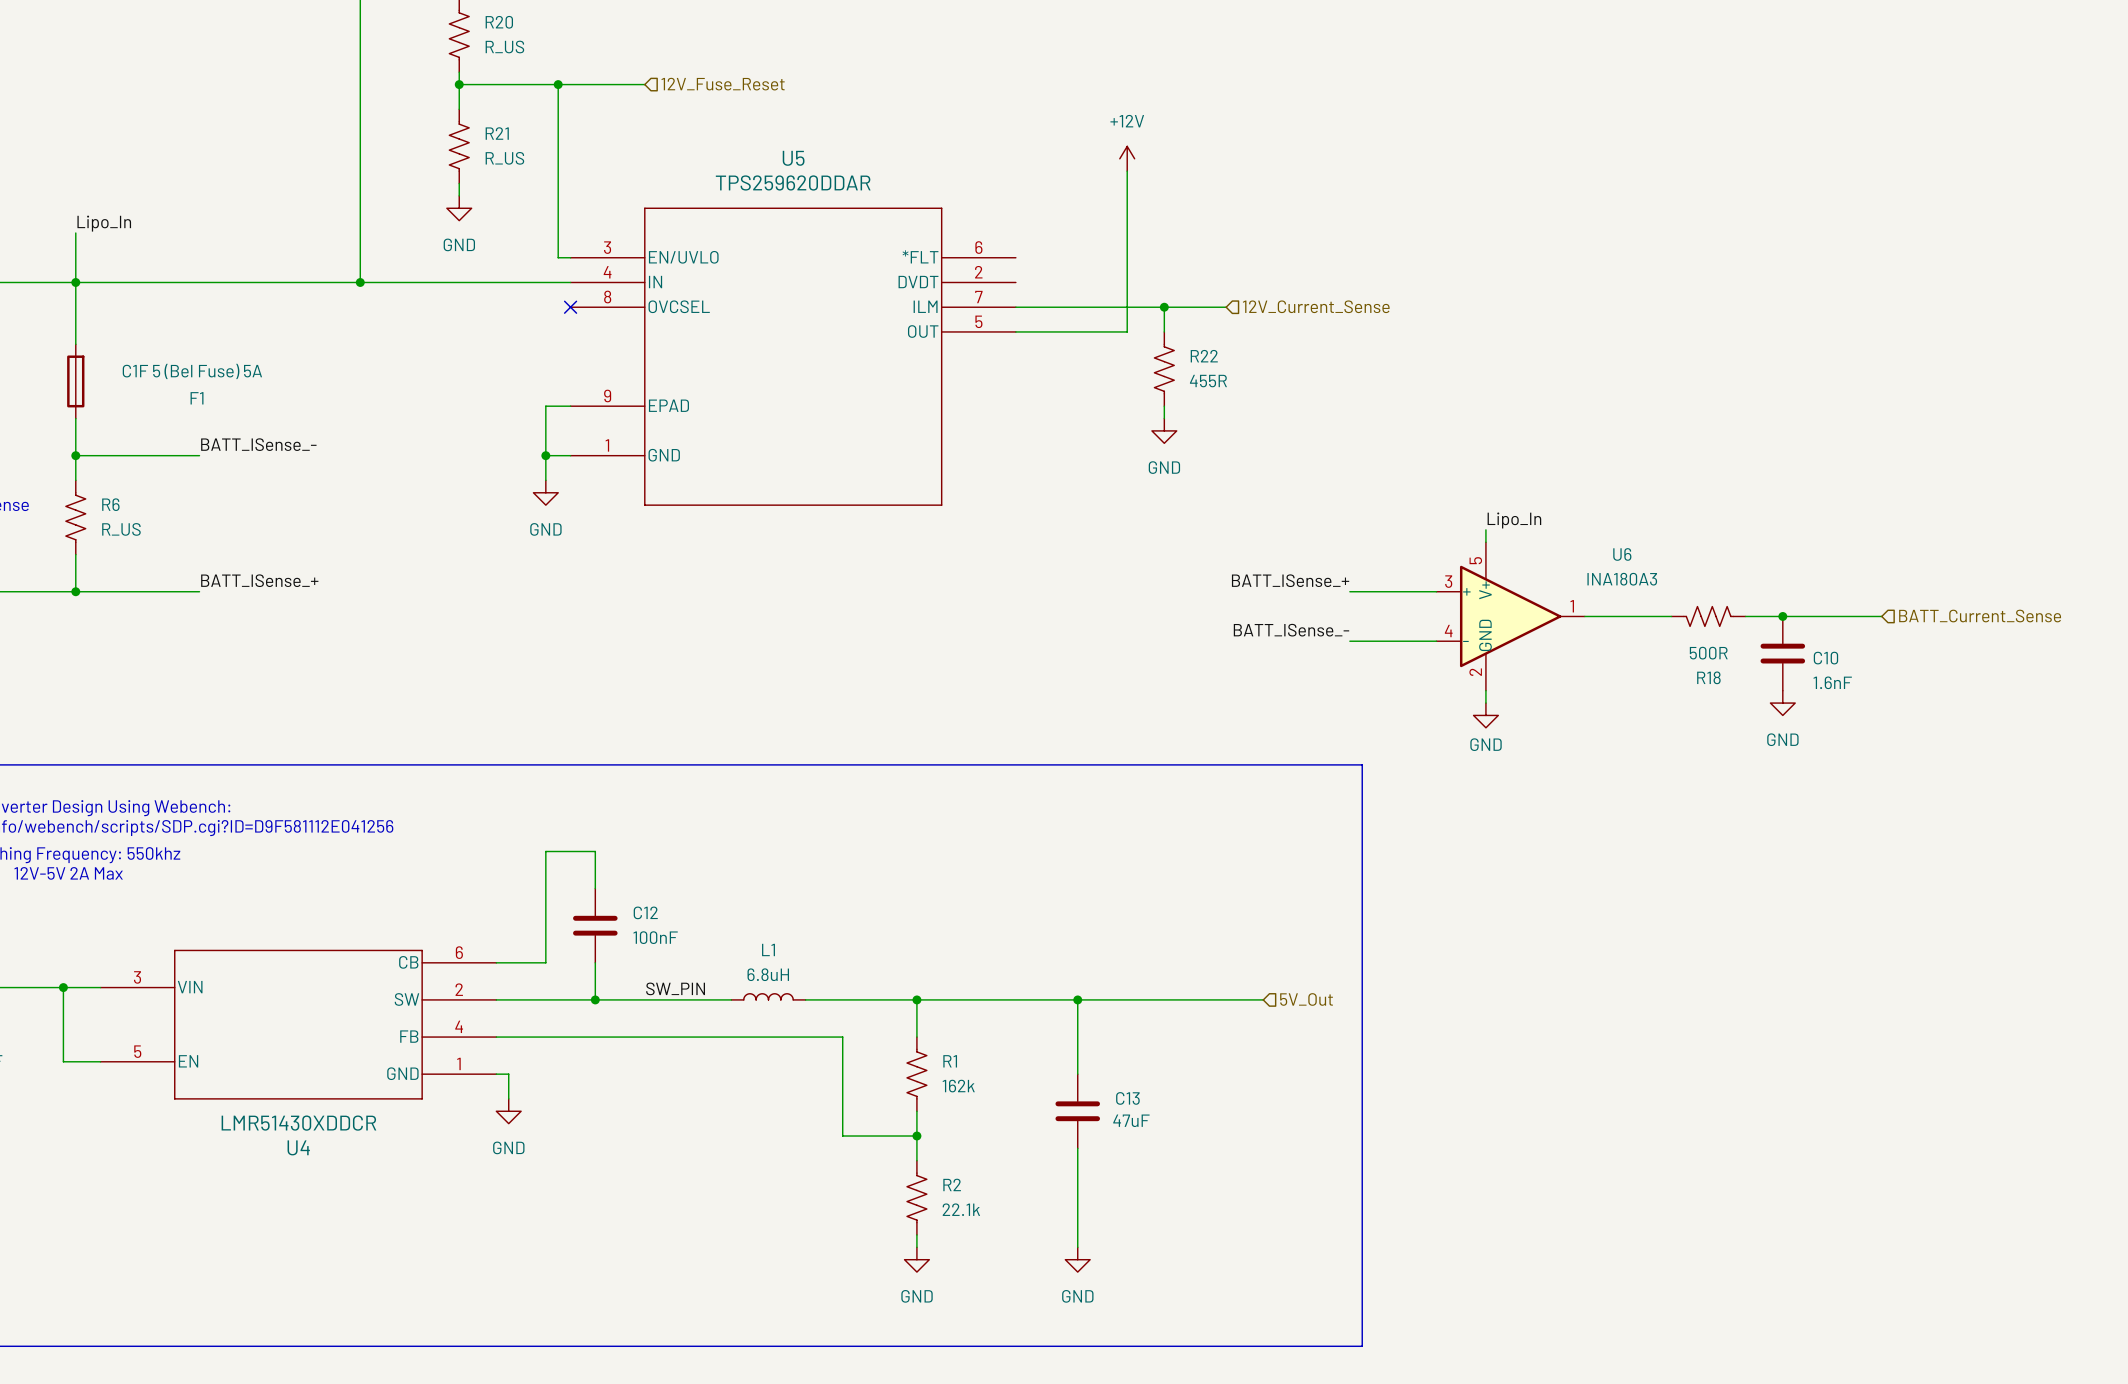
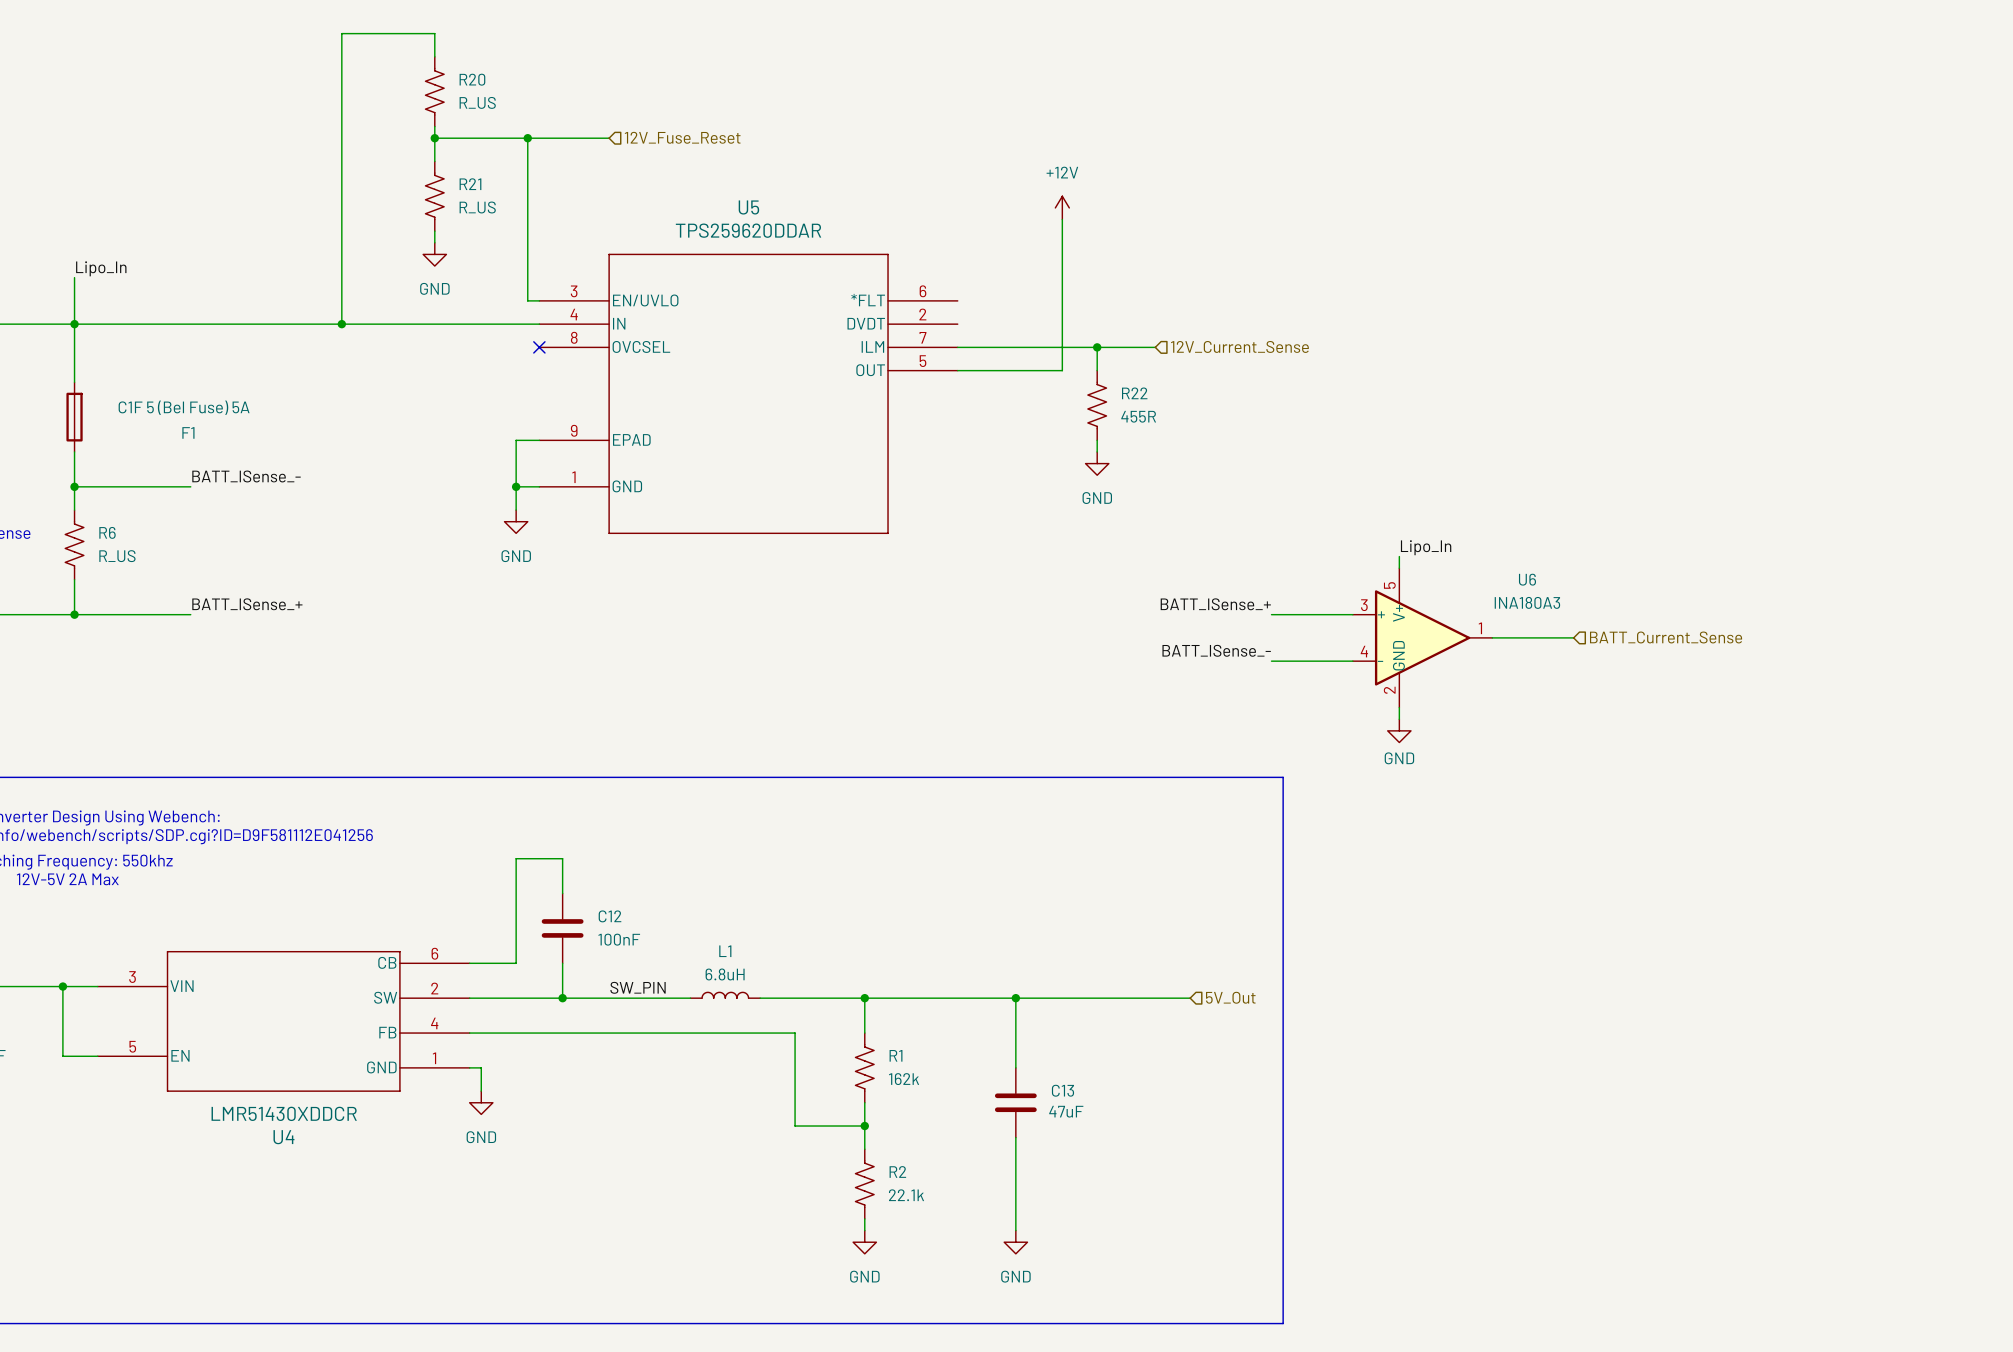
R18: 500R (1708, 616) -> none
wire: (1745, 616) (1881, 616) -> none
junction: (1782, 616) -> none
hierarchical label position: BATT_Current_Sense (1980, 616) -> BATT_Current_Sense (1666, 637)
C10: 1.6nF (1782, 653) -> none
power symbol: GND (1782, 703) -> none

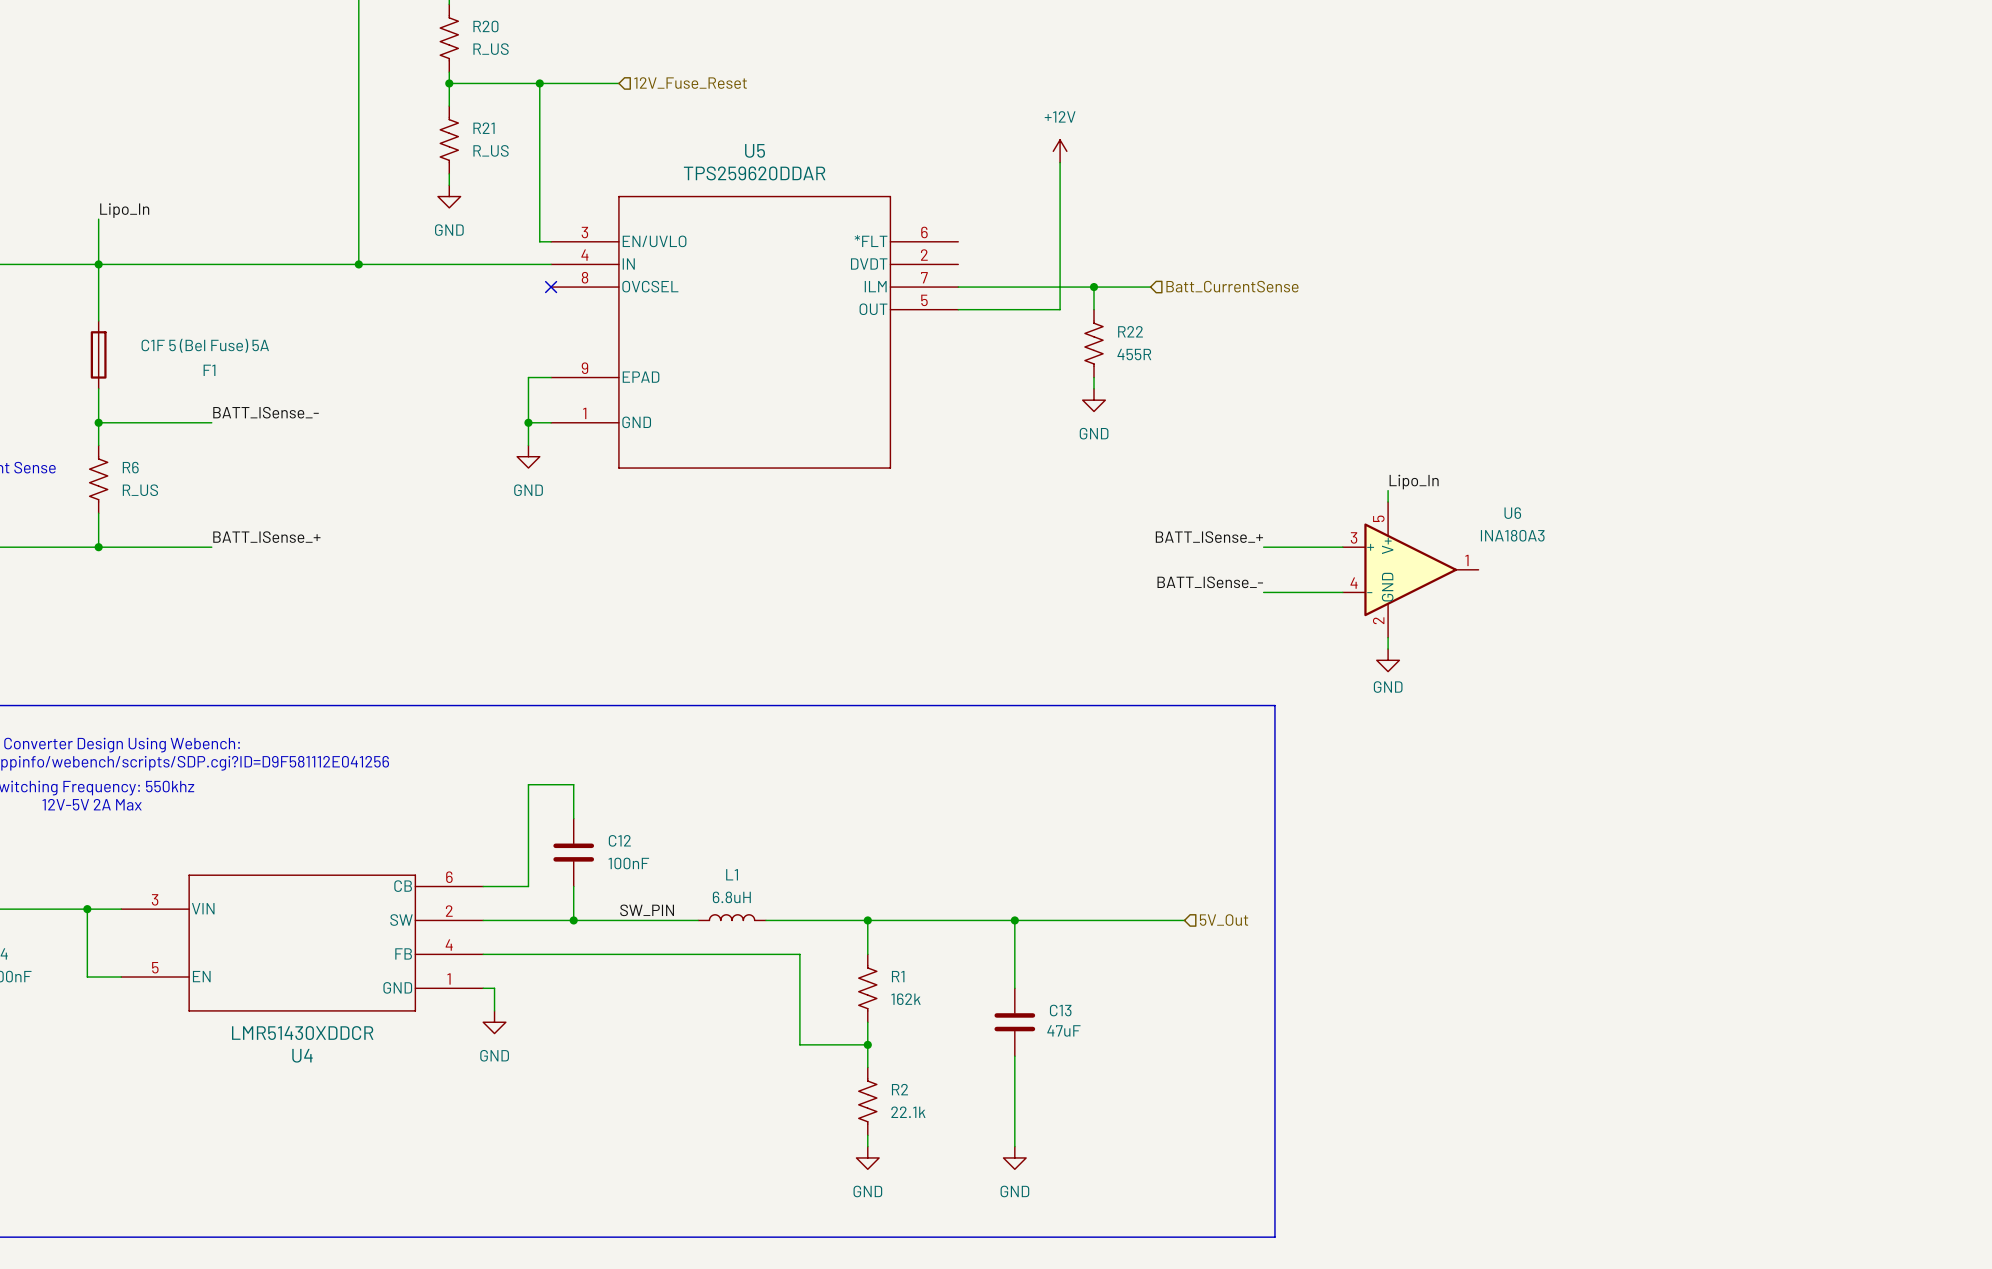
hierarchical label: 12V_Current_Sense (1239, 346) -> Batt_CurrentSense (1232, 286)
wire: (1492, 637) (1573, 637) -> none
hierarchical label: BATT_Current_Sense (1666, 637) -> none

